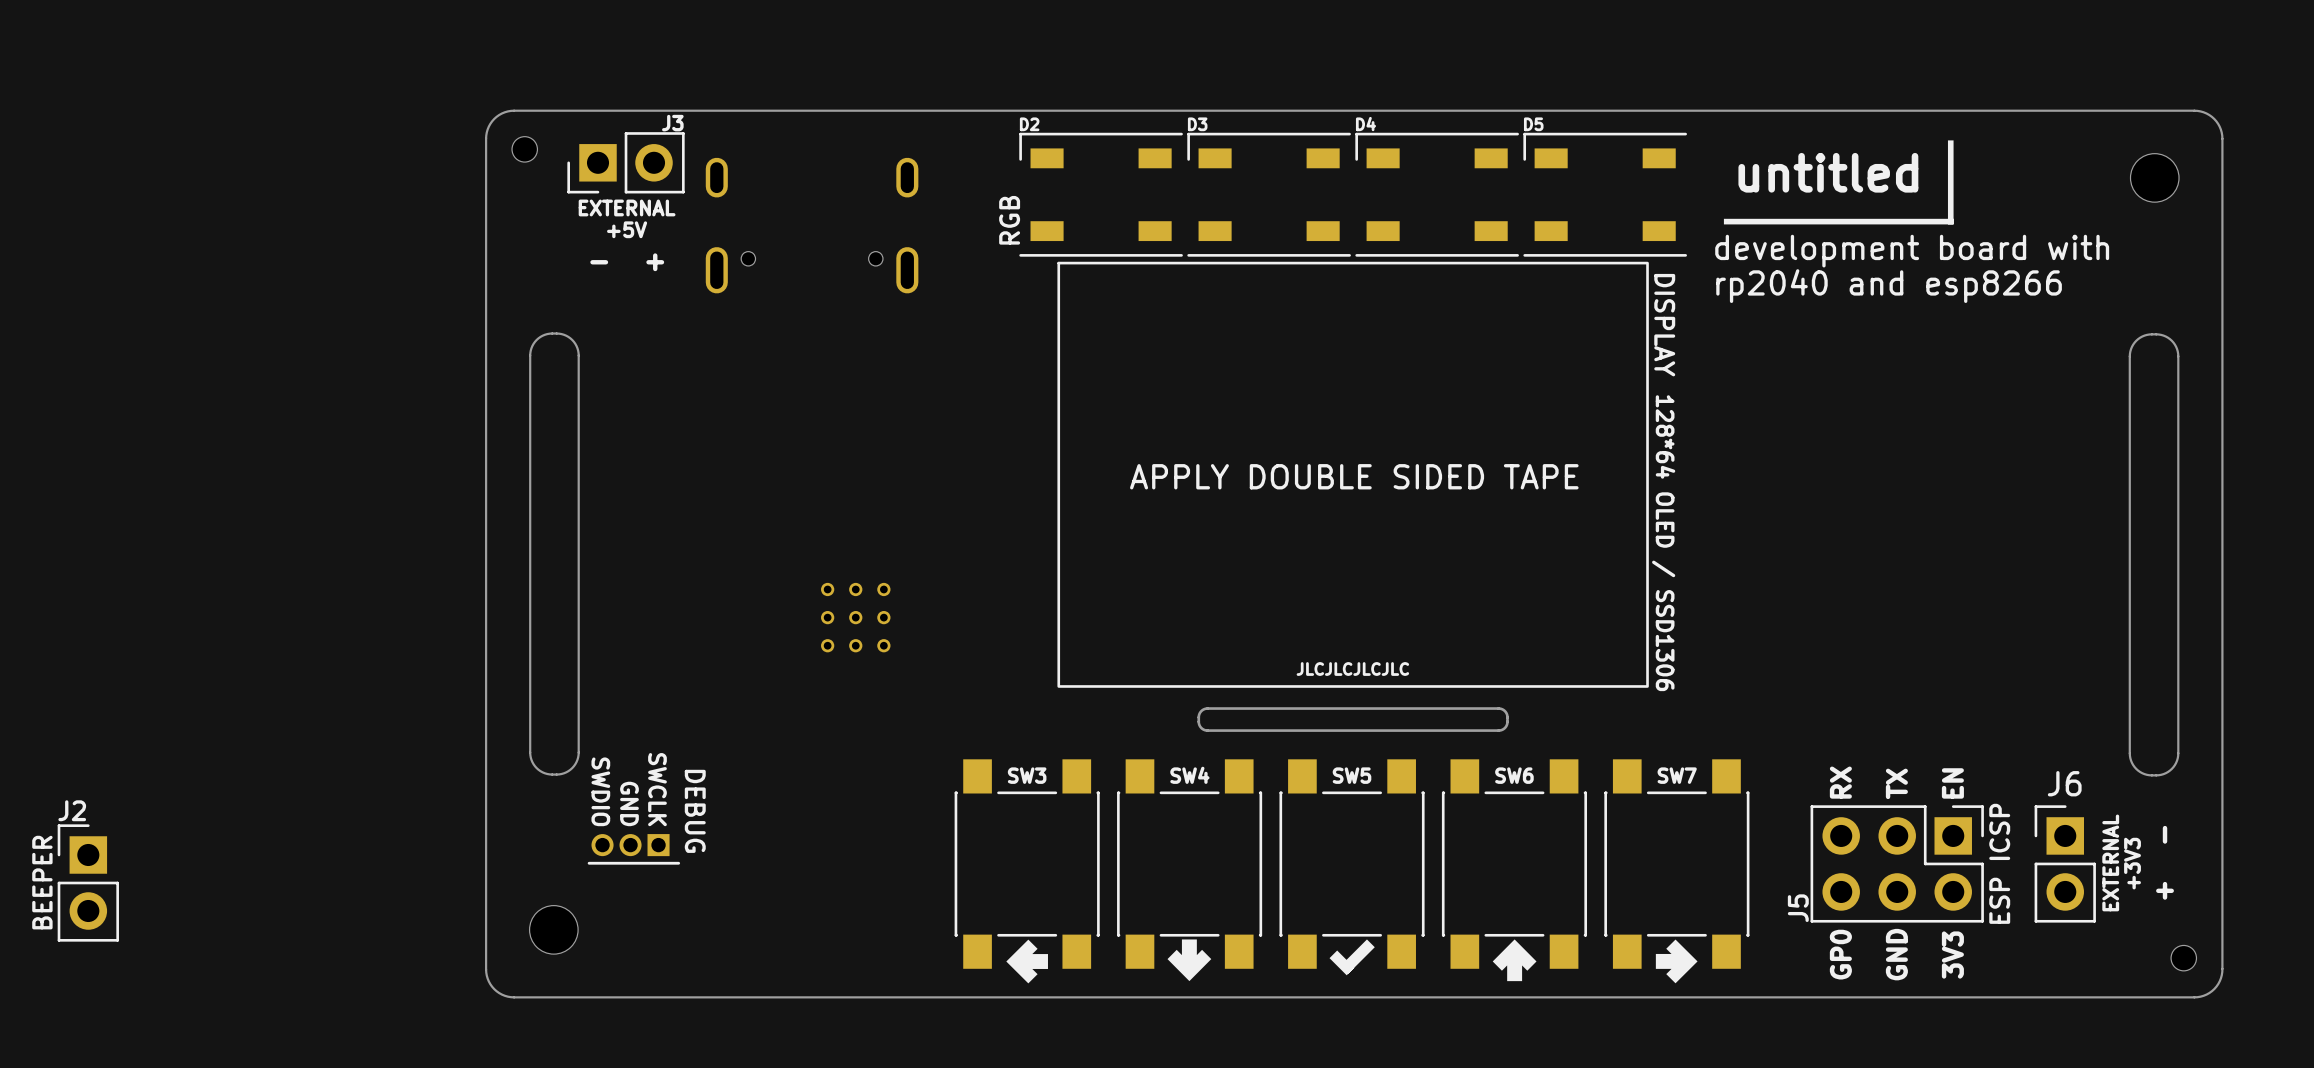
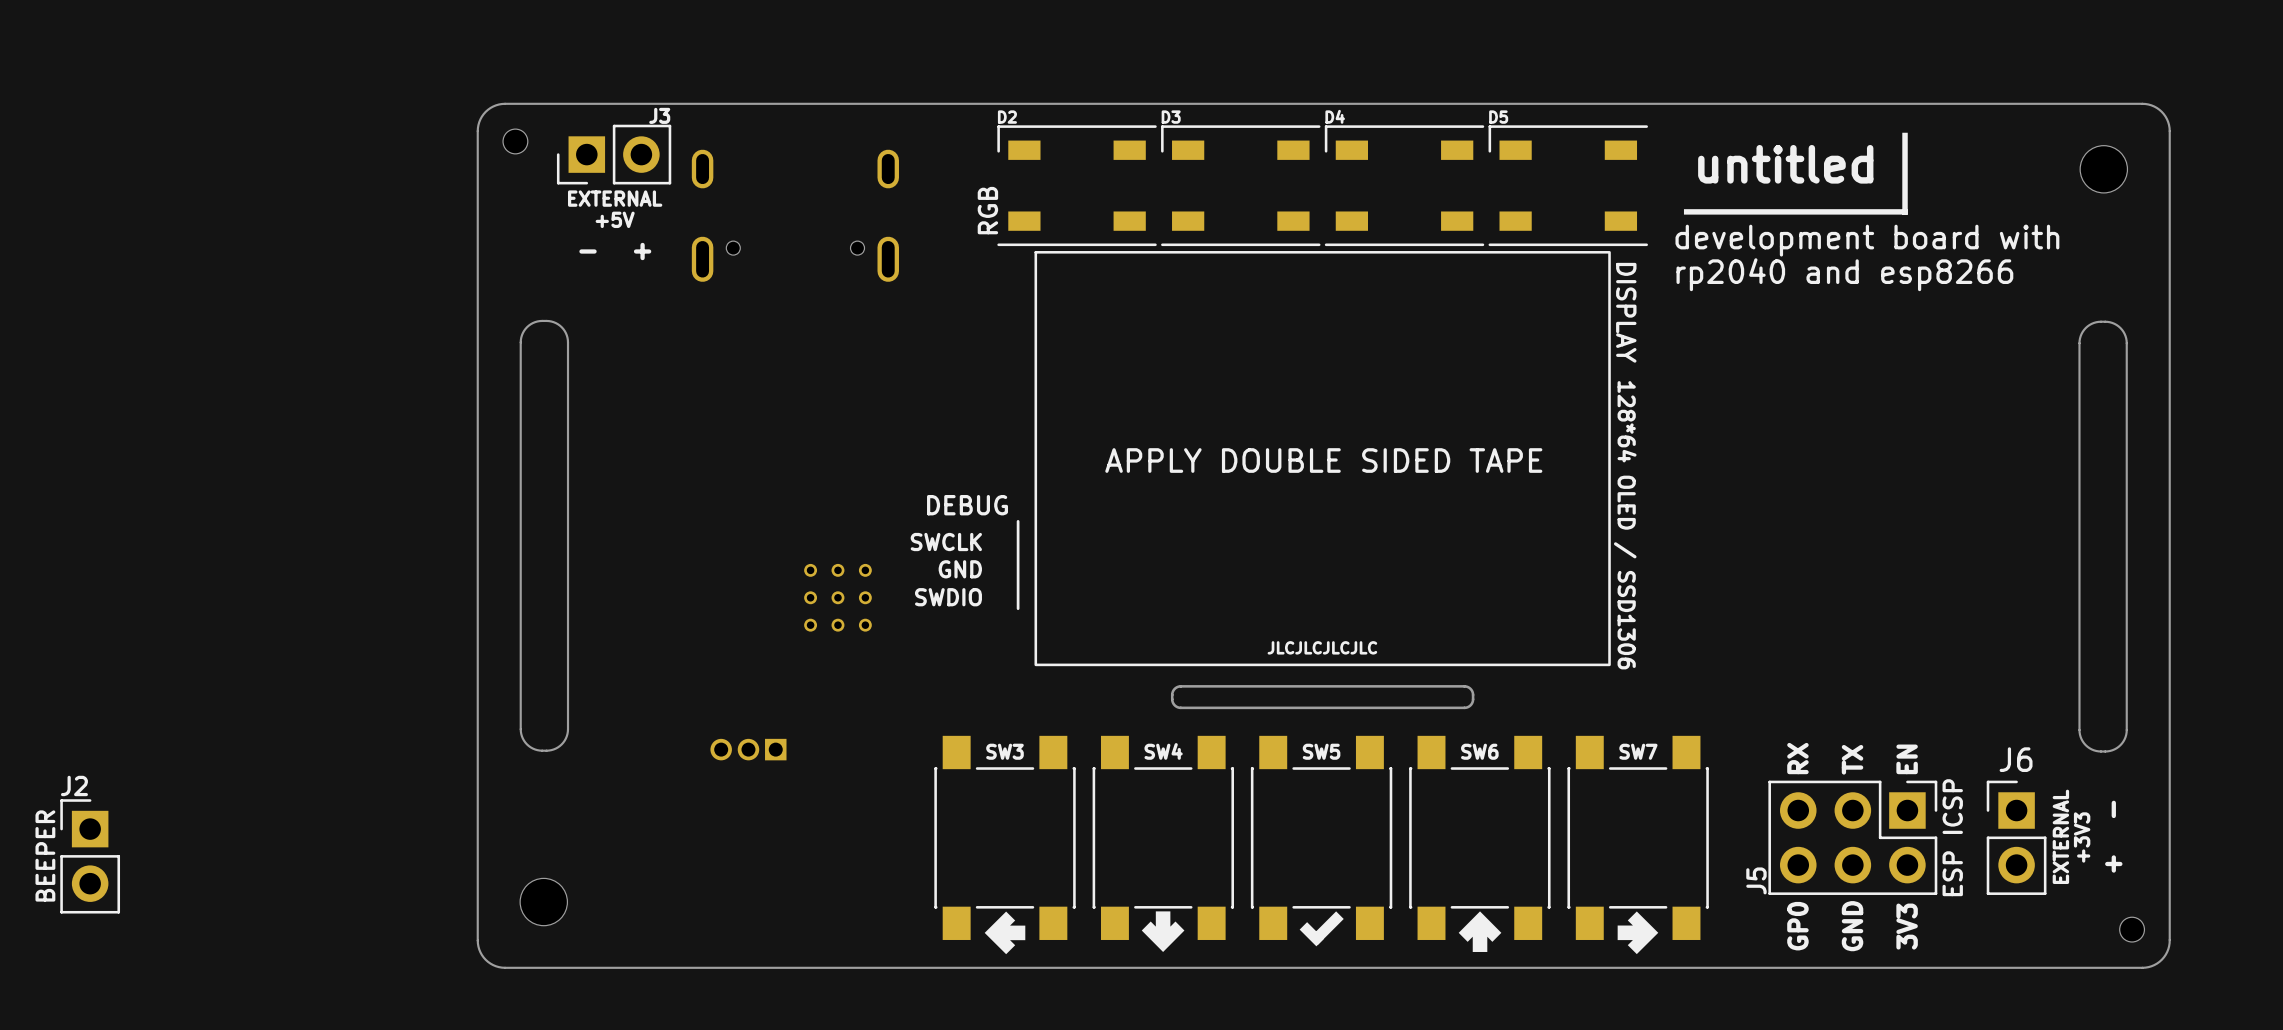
line: none -> (1018, 521) (1018, 608)
text rotation: 0° (657, 789) -> 90° counterclockwise (946, 542)
text position: SWCLK (657, 789) -> SWCLK (946, 542)
text rotation: 0° (600, 791) -> 90° counterclockwise (948, 597)
text position: SWDIO (600, 791) -> SWDIO (948, 597)
text rotation: 0° (629, 803) -> 90° counterclockwise (960, 569)
text position: GND (629, 803) -> GND (960, 569)
text rotation: 0° (695, 811) -> 90° counterclockwise (967, 505)
text position: DEBUG (695, 811) -> DEBUG (967, 505)
part position: (630, 845) -> (748, 749)
line: (589, 863) (678, 863) -> none

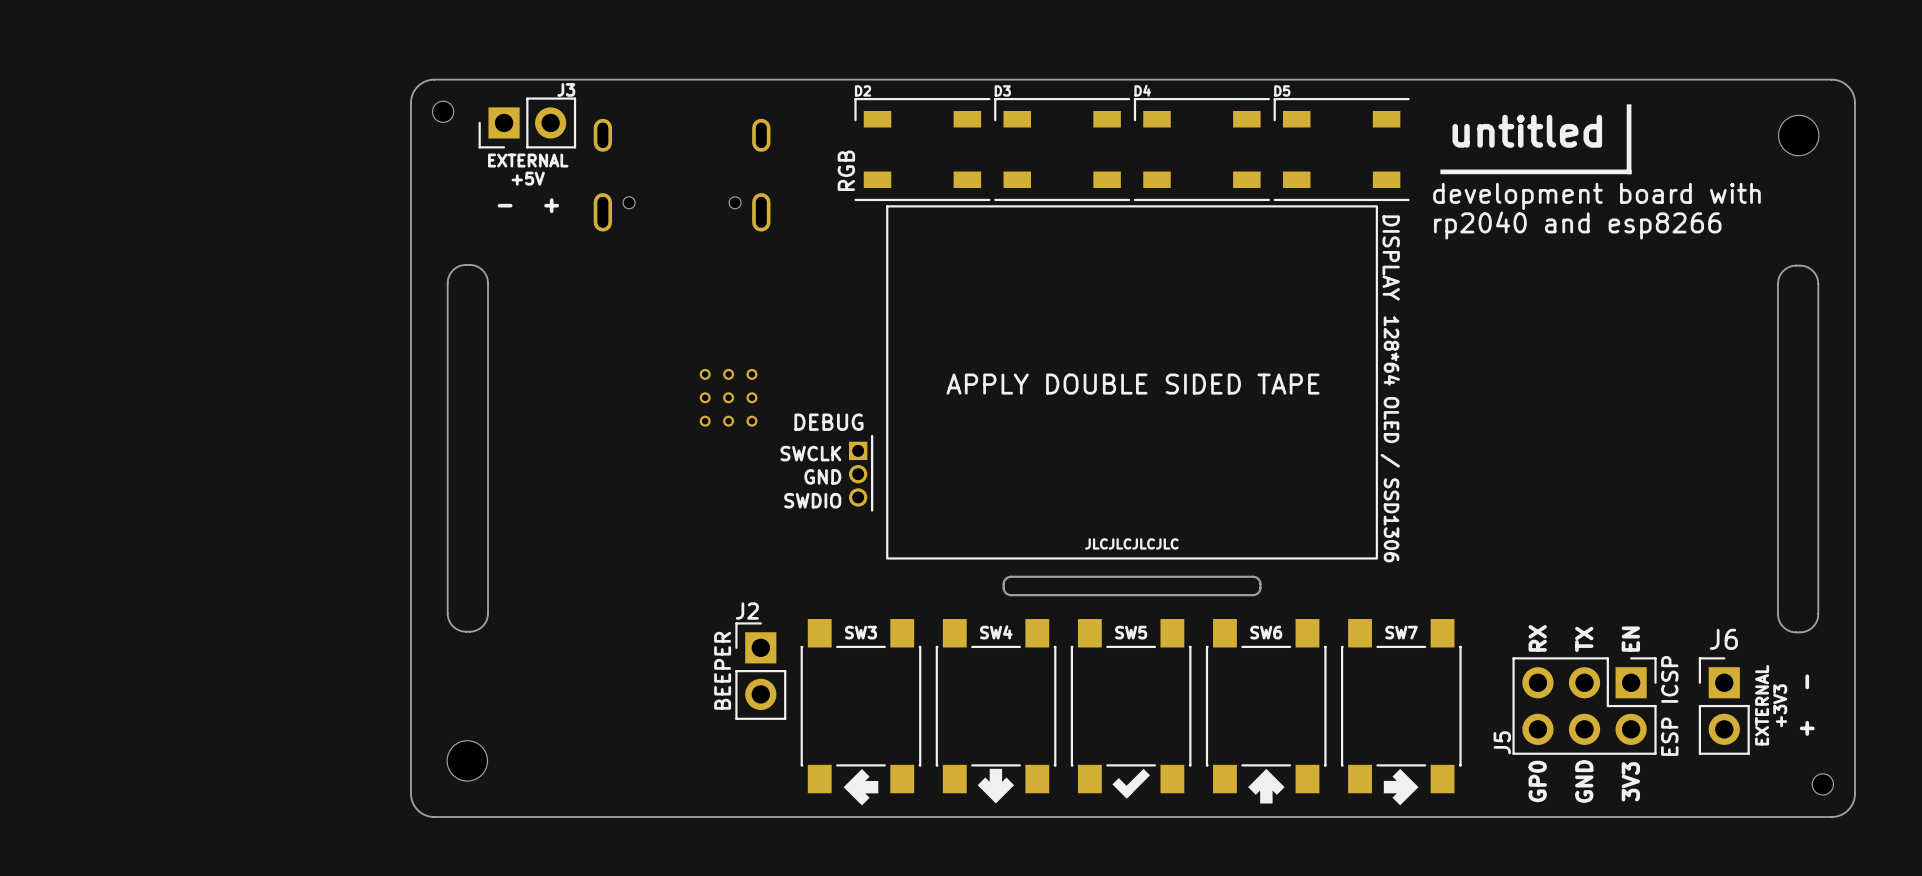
part position: (837, 597) -> (728, 397)
part rotation: 0° (748, 749) -> 90° counterclockwise (858, 474)
part position: (748, 749) -> (858, 474)
text: none -> BEEPER (722, 670)
text: BEEPER (45, 855) -> none
J2 position: (90, 856) -> (760, 671)

